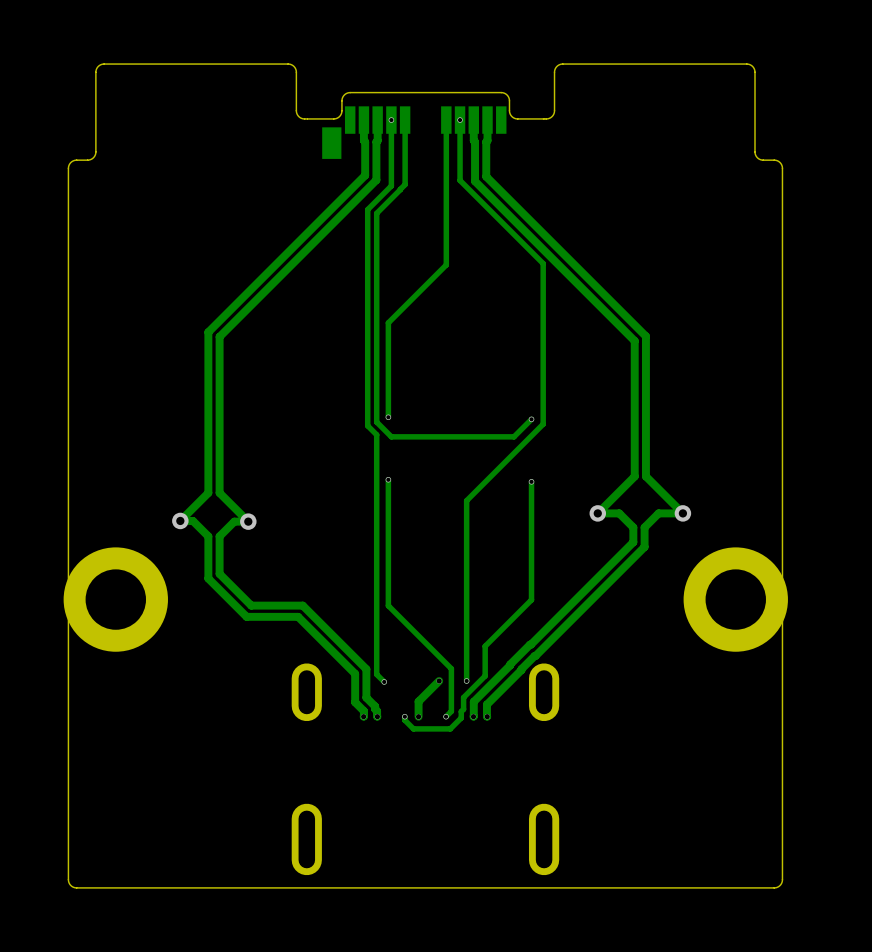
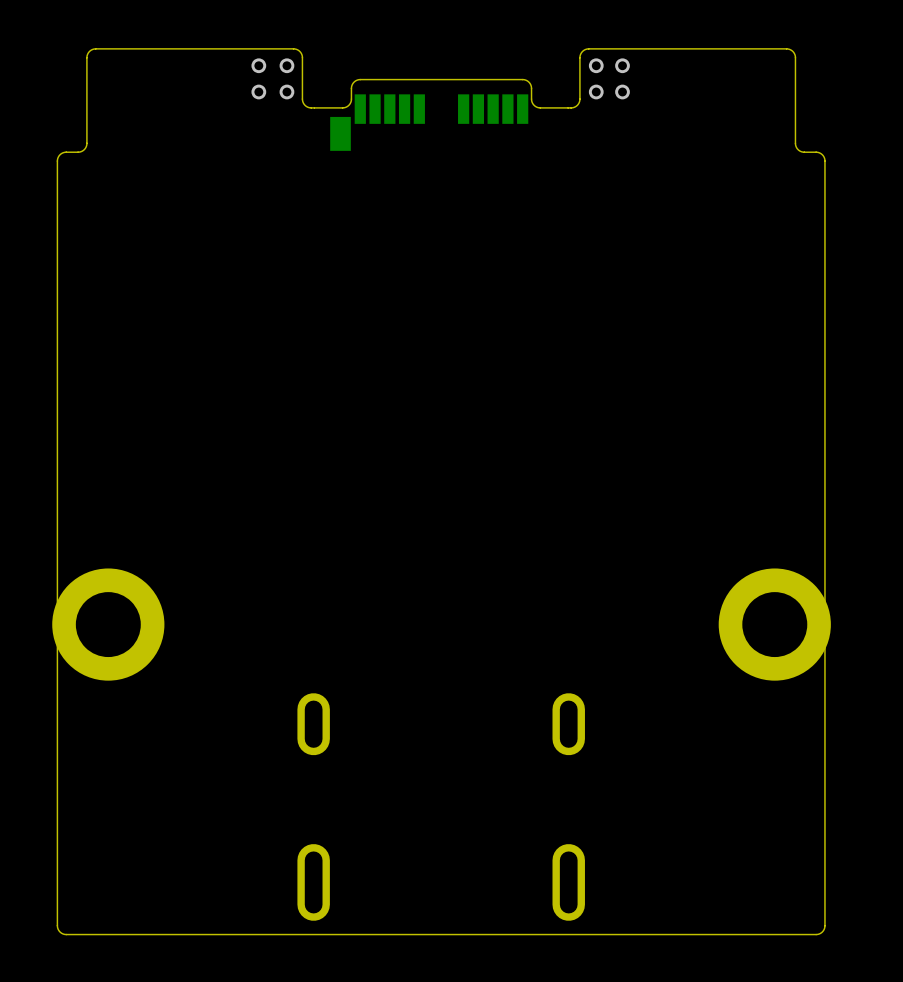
via: none -> (258, 65)
via: none -> (286, 65)
via: none -> (596, 65)
via: none -> (622, 65)
via: none -> (258, 92)
via: none -> (286, 92)
via: none -> (596, 92)
via: none -> (622, 92)
track: (363, 120) (365, 175) (208, 332) (208, 492) (180, 520) (192, 520) (208, 536) (208, 578) (246, 616) (298, 616) (355, 673) (355, 702) (363, 711) (363, 716) -> none
track: (377, 120) (376, 180) (219, 336) (219, 492) (248, 521) (234, 521) (219, 536) (219, 573) (251, 605) (302, 605) (366, 669) (366, 697) (375, 706) (377, 716) -> none
track: (391, 120) (391, 185) (367, 209) (367, 425) (376, 434) (376, 674) (384, 681) -> none
via: (391, 120) -> none
track: (405, 120) (405, 184) (400, 189) -> none
track: (446, 120) (446, 264) (388, 322) (388, 417) -> none
track: (460, 120) (460, 180) (543, 263) (543, 424) (466, 500) (466, 680) -> none
via: (460, 120) -> none
track: (473, 120) (475, 181) (634, 340) (634, 476) (597, 513) (619, 513) (633, 527) (633, 542) (473, 701) (473, 716) -> none
track: (487, 120) (486, 176) (645, 336) (645, 476) (682, 513) (658, 513) (644, 527) (644, 546) (486, 704) (486, 716) -> none
track: (400, 189) (376, 213) (376, 422) (391, 436) (514, 436) (531, 419) -> none
via: (388, 417) -> none
via: (531, 419) -> none
track: (388, 479) (388, 605) (451, 668) (451, 711) (446, 716) -> none
via: (388, 479) -> none
track: (531, 481) (531, 599) (485, 646) (485, 675) (463, 697) (461, 717) (450, 728) (413, 728) (404, 720) (404, 716) -> none
via: (531, 481) -> none
via: (597, 513) -> none
via: (682, 513) -> none
via: (180, 520) -> none
via: (248, 521) -> none
track: (439, 680) (418, 701) (418, 716) -> none
via: (439, 680) -> none
via: (466, 680) -> none
via: (384, 681) -> none
via: (363, 716) -> none
via: (377, 716) -> none
via: (404, 716) -> none
via: (418, 716) -> none
via: (446, 716) -> none
via: (473, 716) -> none
via: (487, 716) -> none

